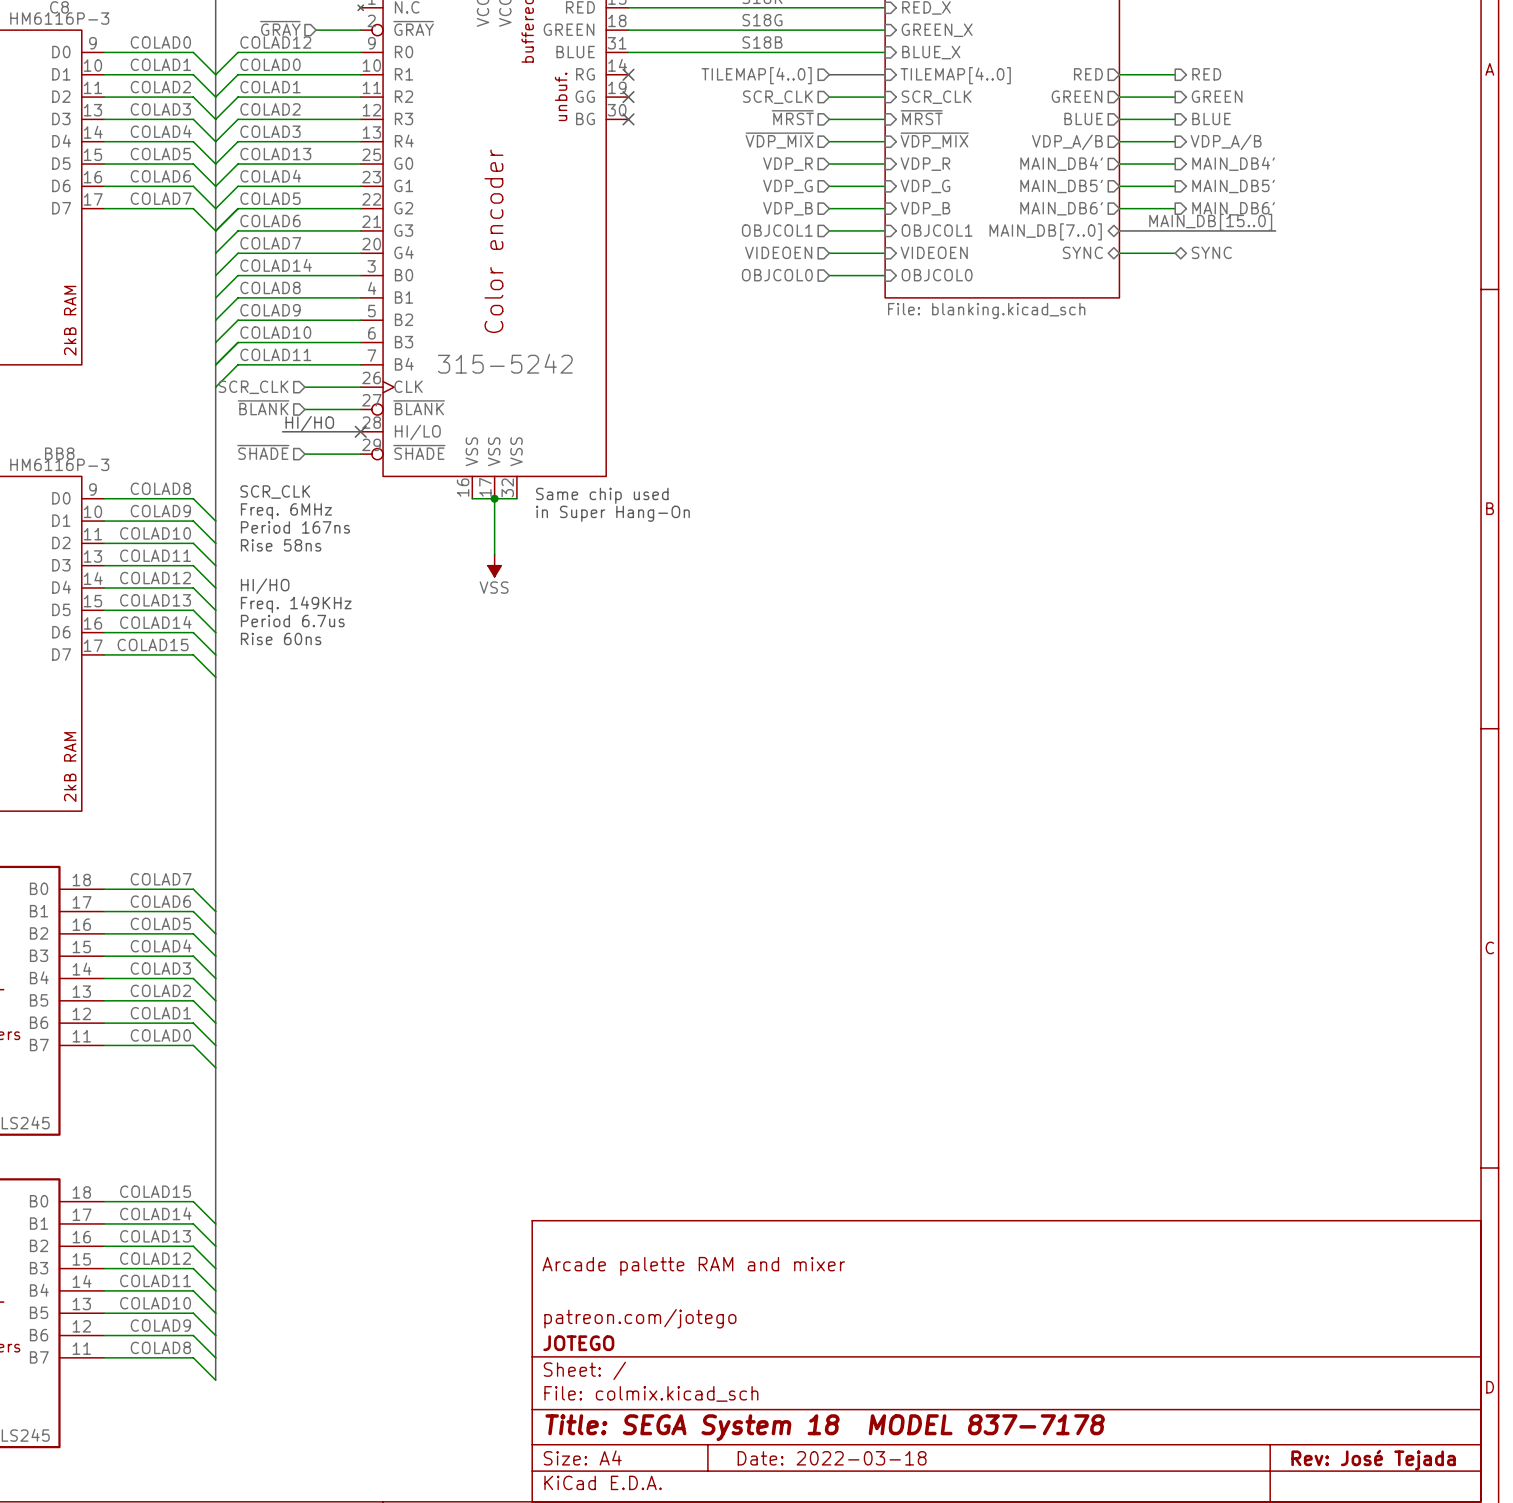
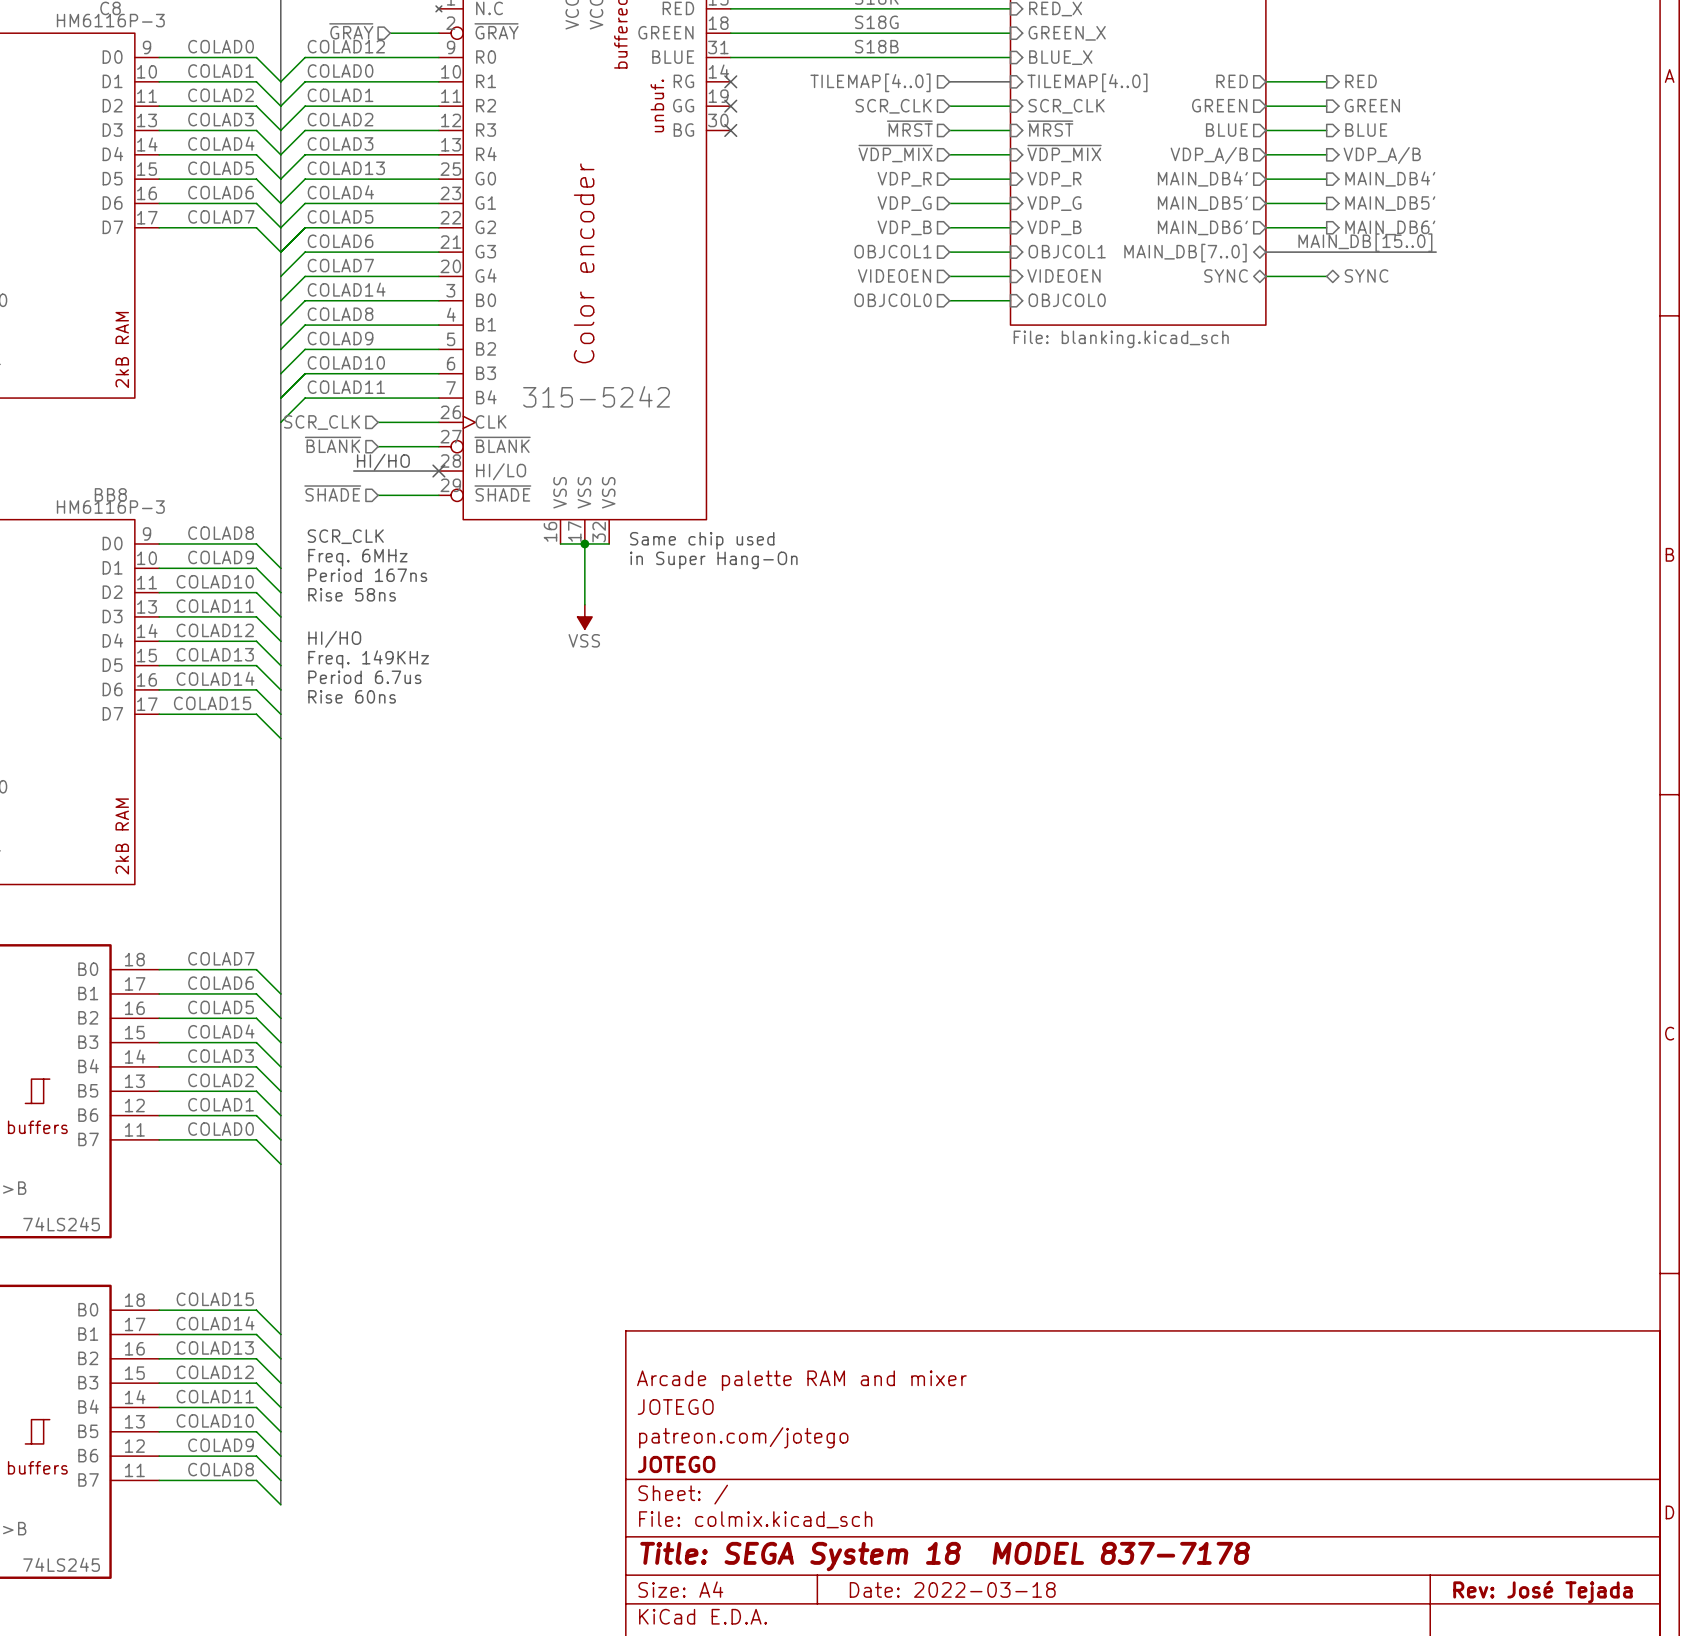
title block: none -> JOTEGO (675, 1407)

